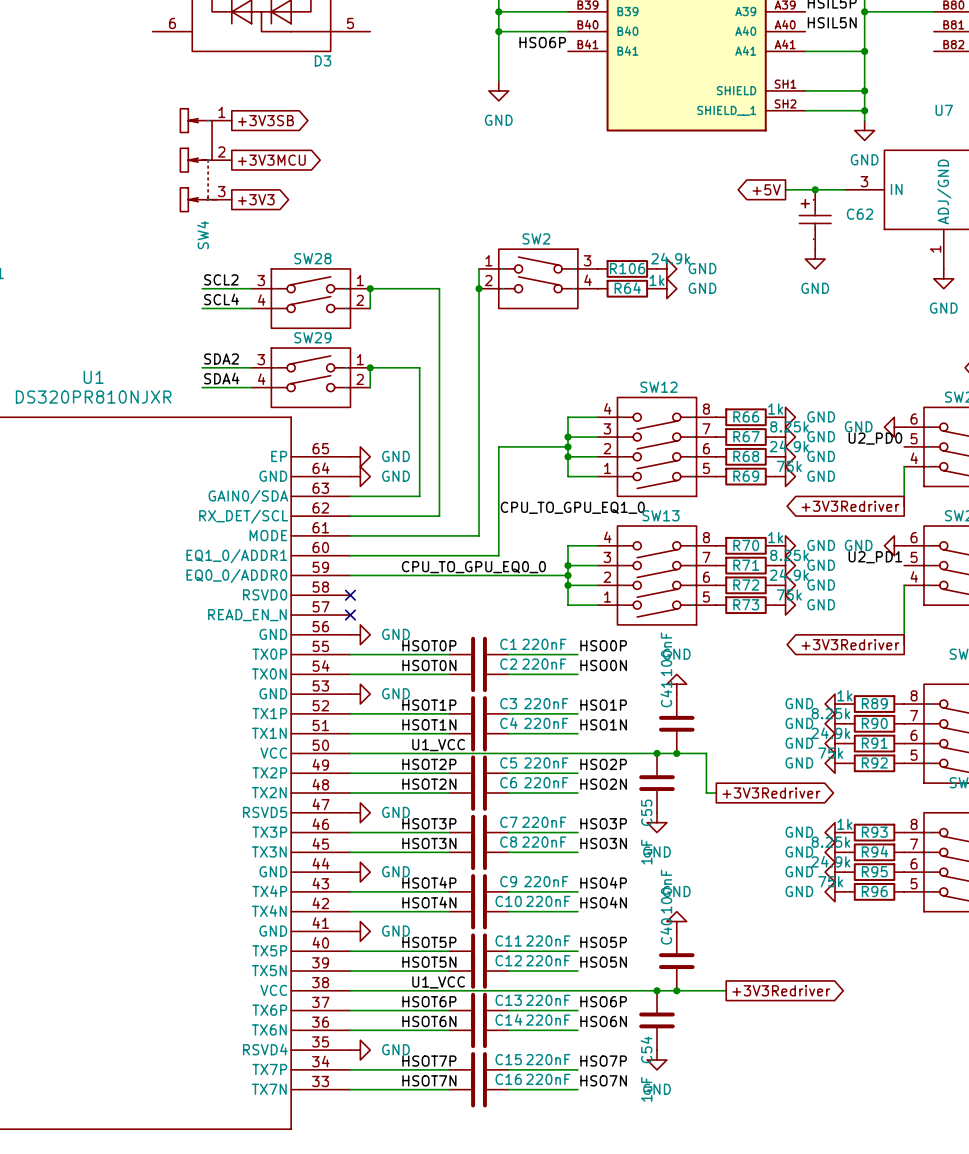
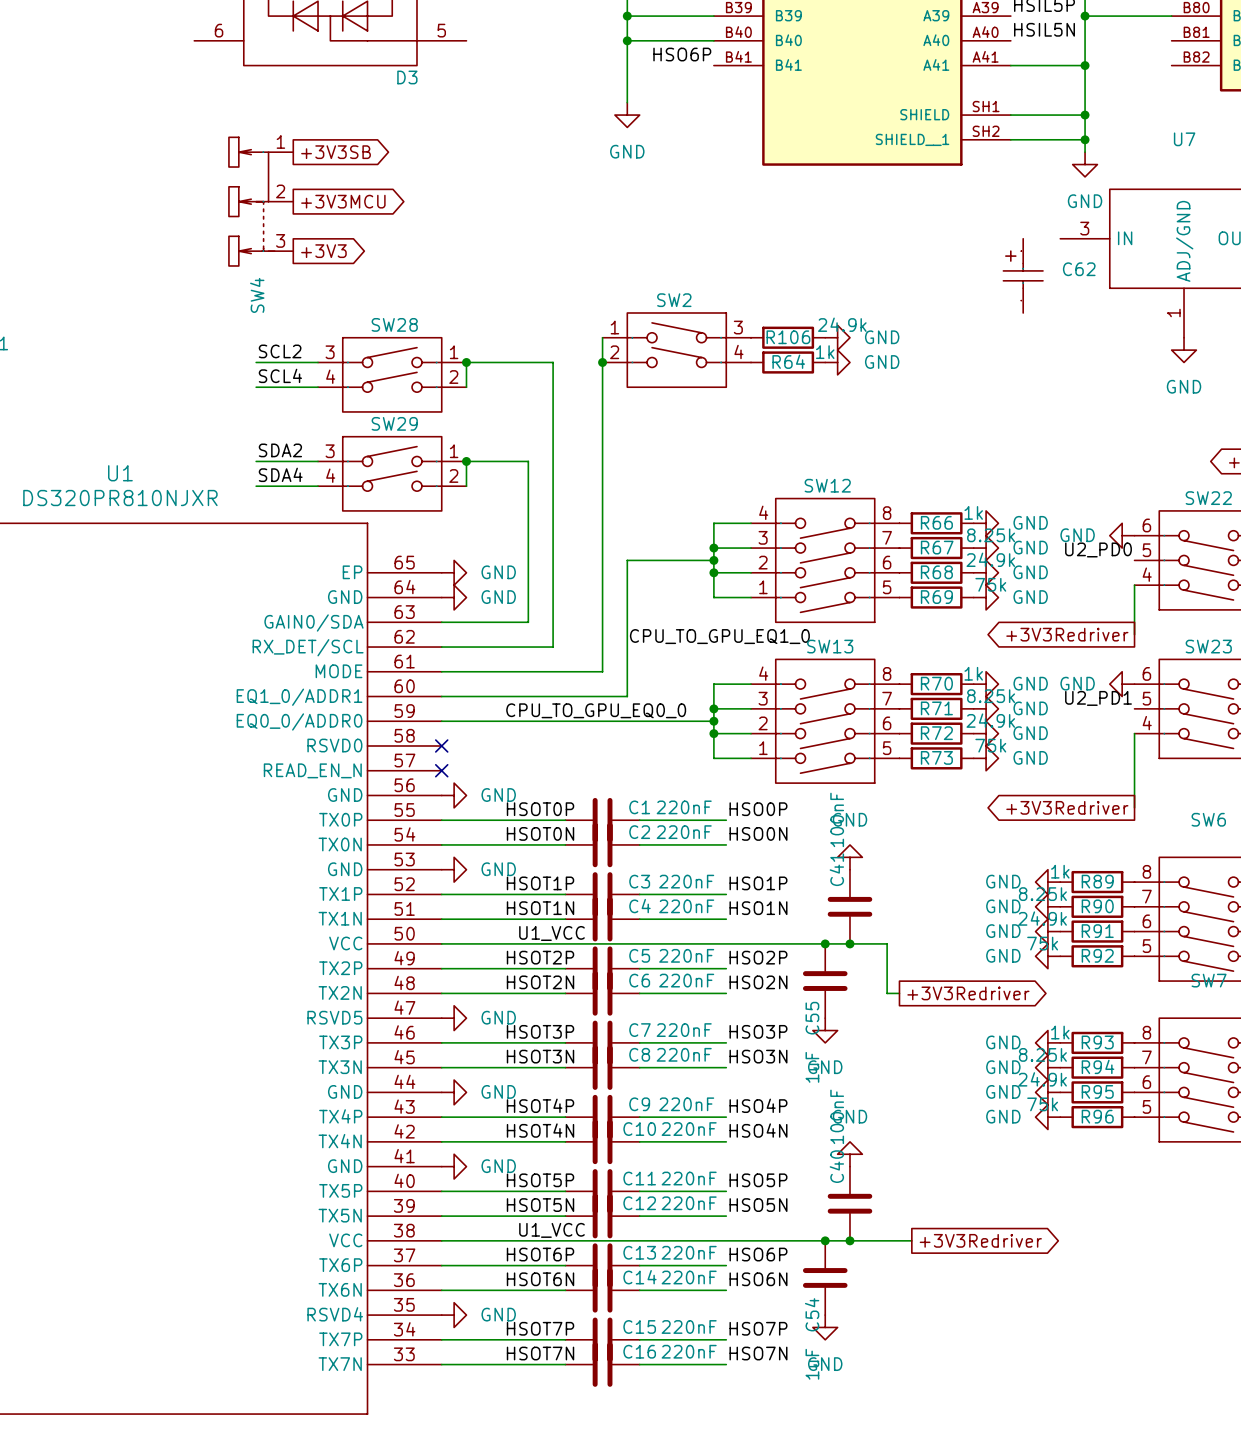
global label: +5V (766, 189) -> none
wire: (785, 189) (844, 189) -> none
junction: (815, 189) -> none
power symbol: GND (815, 259) -> none

